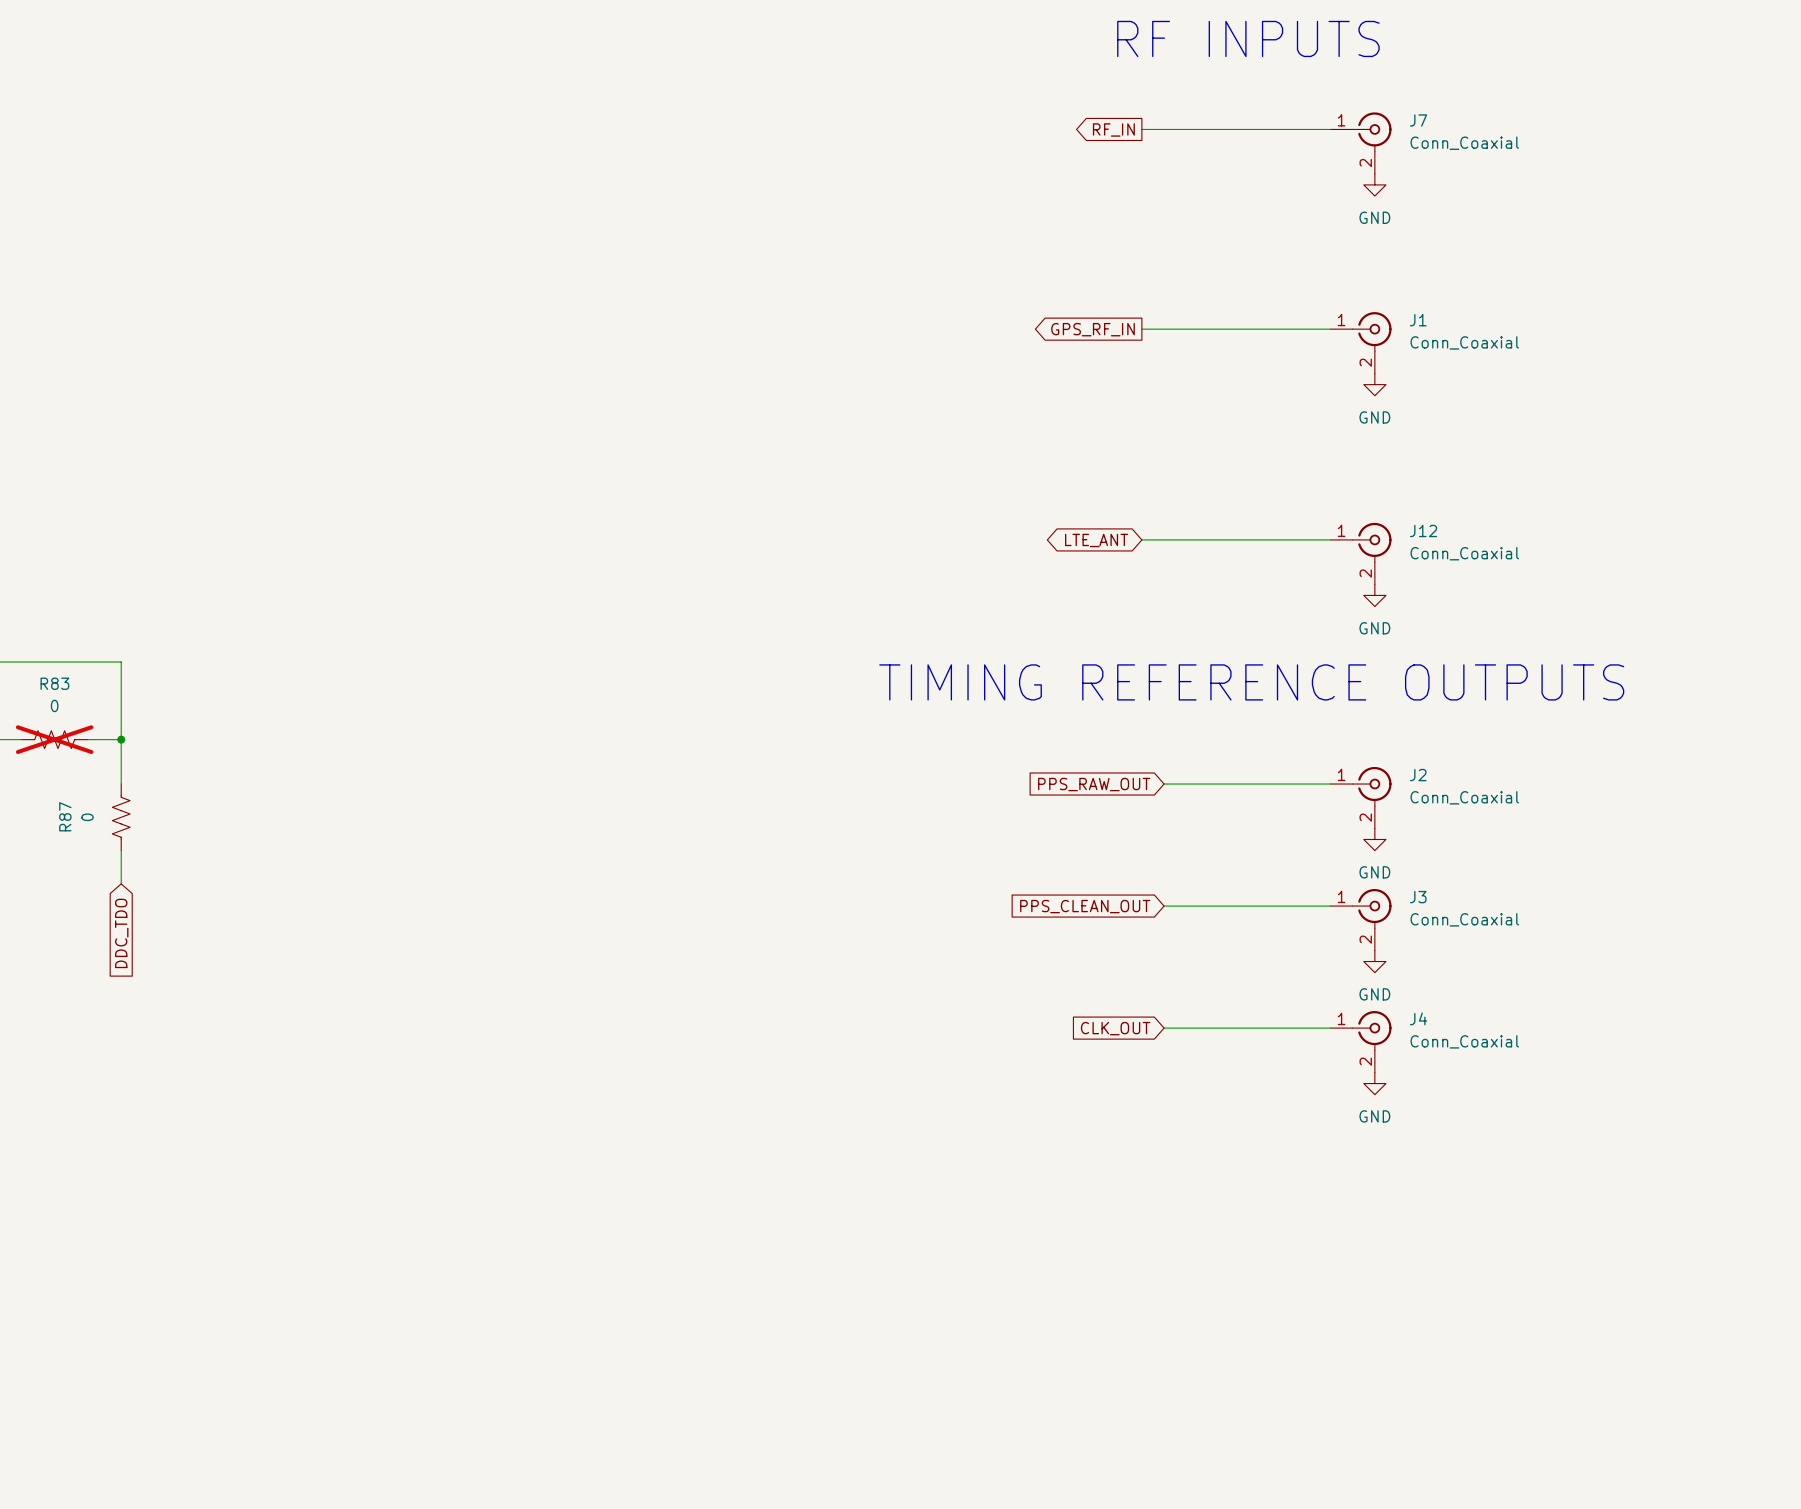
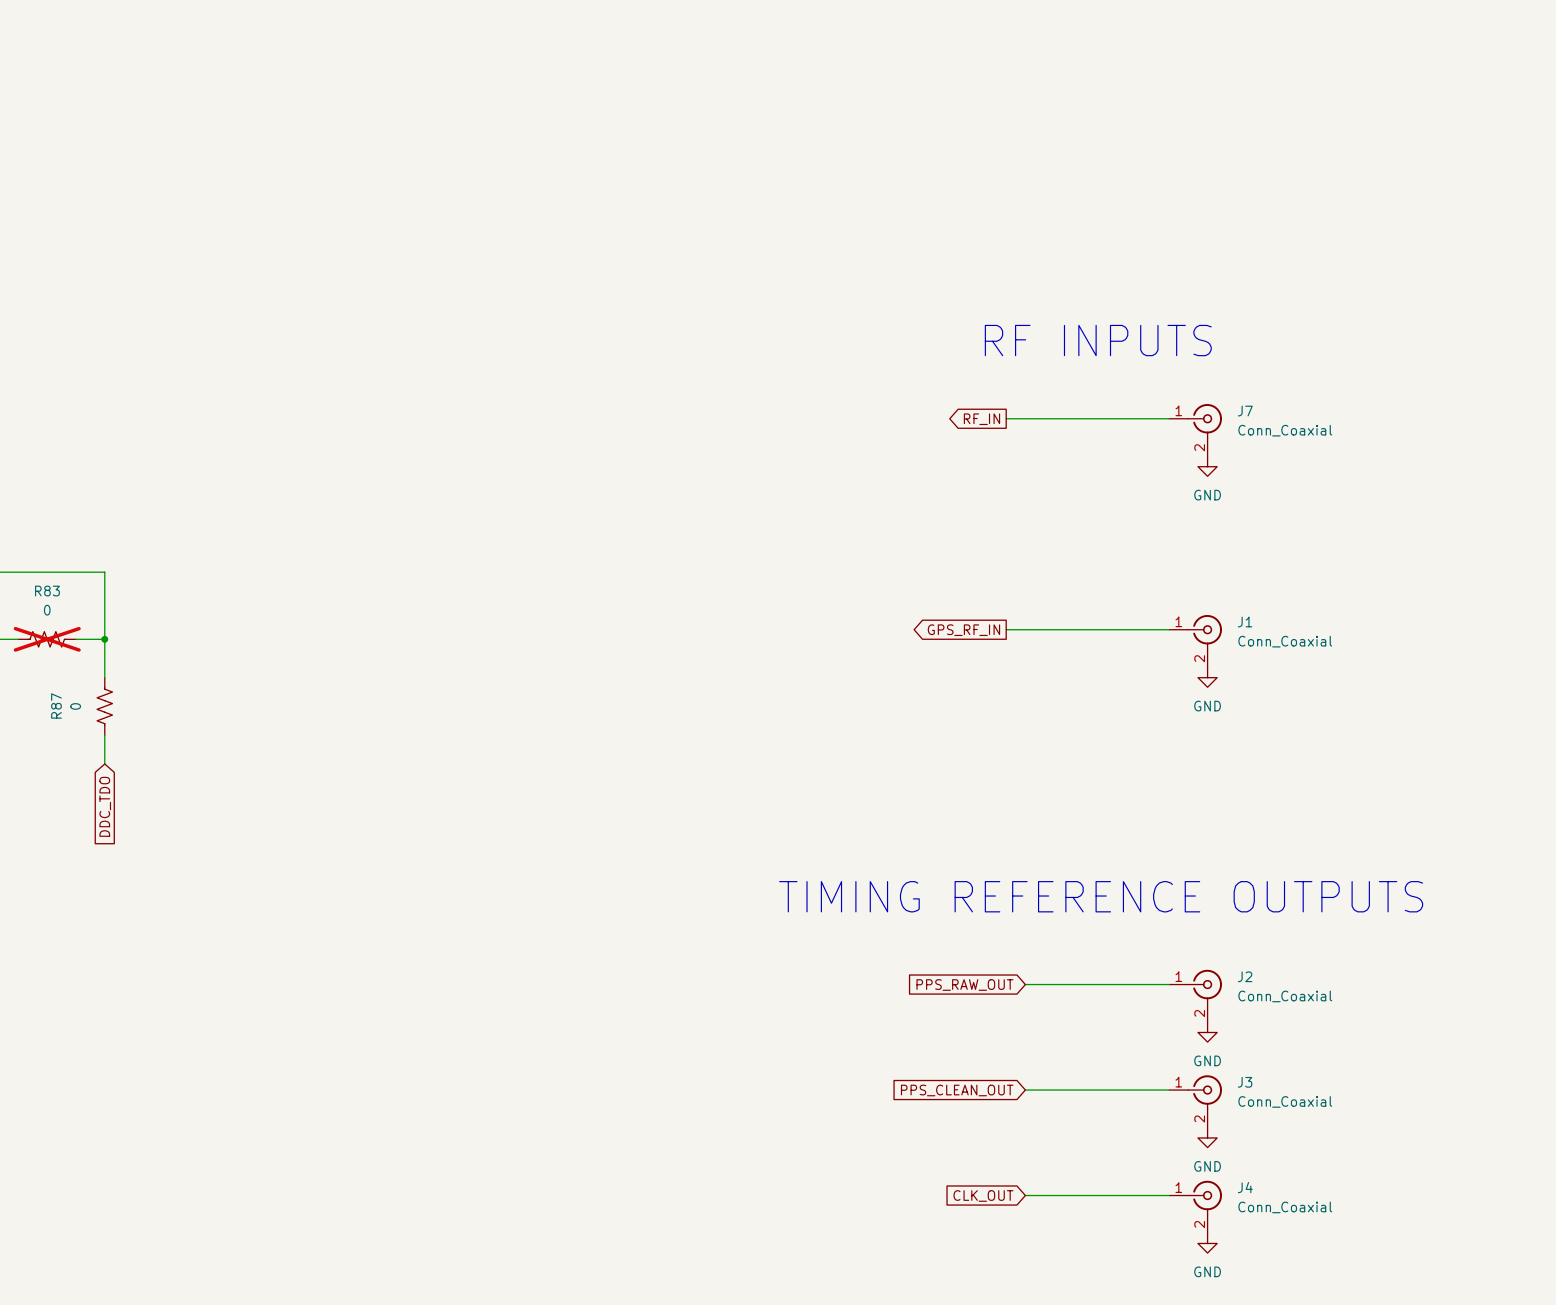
text: RF INPUTS (1248, 38) -> none
global label: RF_IN (1113, 129) -> none
wire: (1141, 129) (1330, 129) -> none
J7 position: (1361, 143) -> (1195, 430)
power symbol: GND (1374, 184) -> none
global label: GPS_RF_IN (1093, 329) -> none
wire: (1141, 329) (1330, 329) -> none
J1 position: (1361, 342) -> (1195, 641)
power symbol: GND (1374, 384) -> none
text: none -> RF INPUTS (1098, 340)
global label: none -> RF_IN (981, 419)
wire: (1141, 539) (1330, 539) -> (1006, 418) (1169, 418)
global label: LTE_ANT (1096, 540) -> none
J12: Conn_Coaxial (1361, 553) -> none
power symbol position: GND (1374, 595) -> GND (1207, 466)
text: TIMING REFERENCE OUTPUTS (1251, 682) -> none
wire: none -> (1006, 629) (1169, 629)
global label: none -> GPS_RF_IN (963, 630)
global label: PPS_RAW_OUT (1094, 784) -> none
wire: (1164, 784) (1330, 784) -> none
J2 position: (1361, 797) -> (1195, 996)
power symbol position: GND (1374, 839) -> GND (1207, 677)
global label: PPS_CLEAN_OUT (1085, 906) -> none
wire: (1164, 906) (1330, 906) -> none
J3 position: (1361, 919) -> (1195, 1101)
power symbol: GND (1374, 961) -> none
global label: CLK_OUT (1115, 1028) -> none
wire: (1164, 1028) (1330, 1028) -> (1025, 984) (1169, 984)
text: none -> TIMING REFERENCE OUTPUTS (1101, 896)
J4 position: (1361, 1041) -> (1195, 1207)
power symbol position: GND (1374, 1083) -> GND (1207, 1032)
global label: none -> PPS_RAW_OUT (964, 985)
global label: none -> PPS_CLEAN_OUT (957, 1090)
wire: none -> (1025, 1090) (1169, 1090)
power symbol: none -> GND (1207, 1137)
global label: none -> CLK_OUT (983, 1195)
wire: none -> (1025, 1195) (1169, 1195)
power symbol: none -> GND (1207, 1243)

